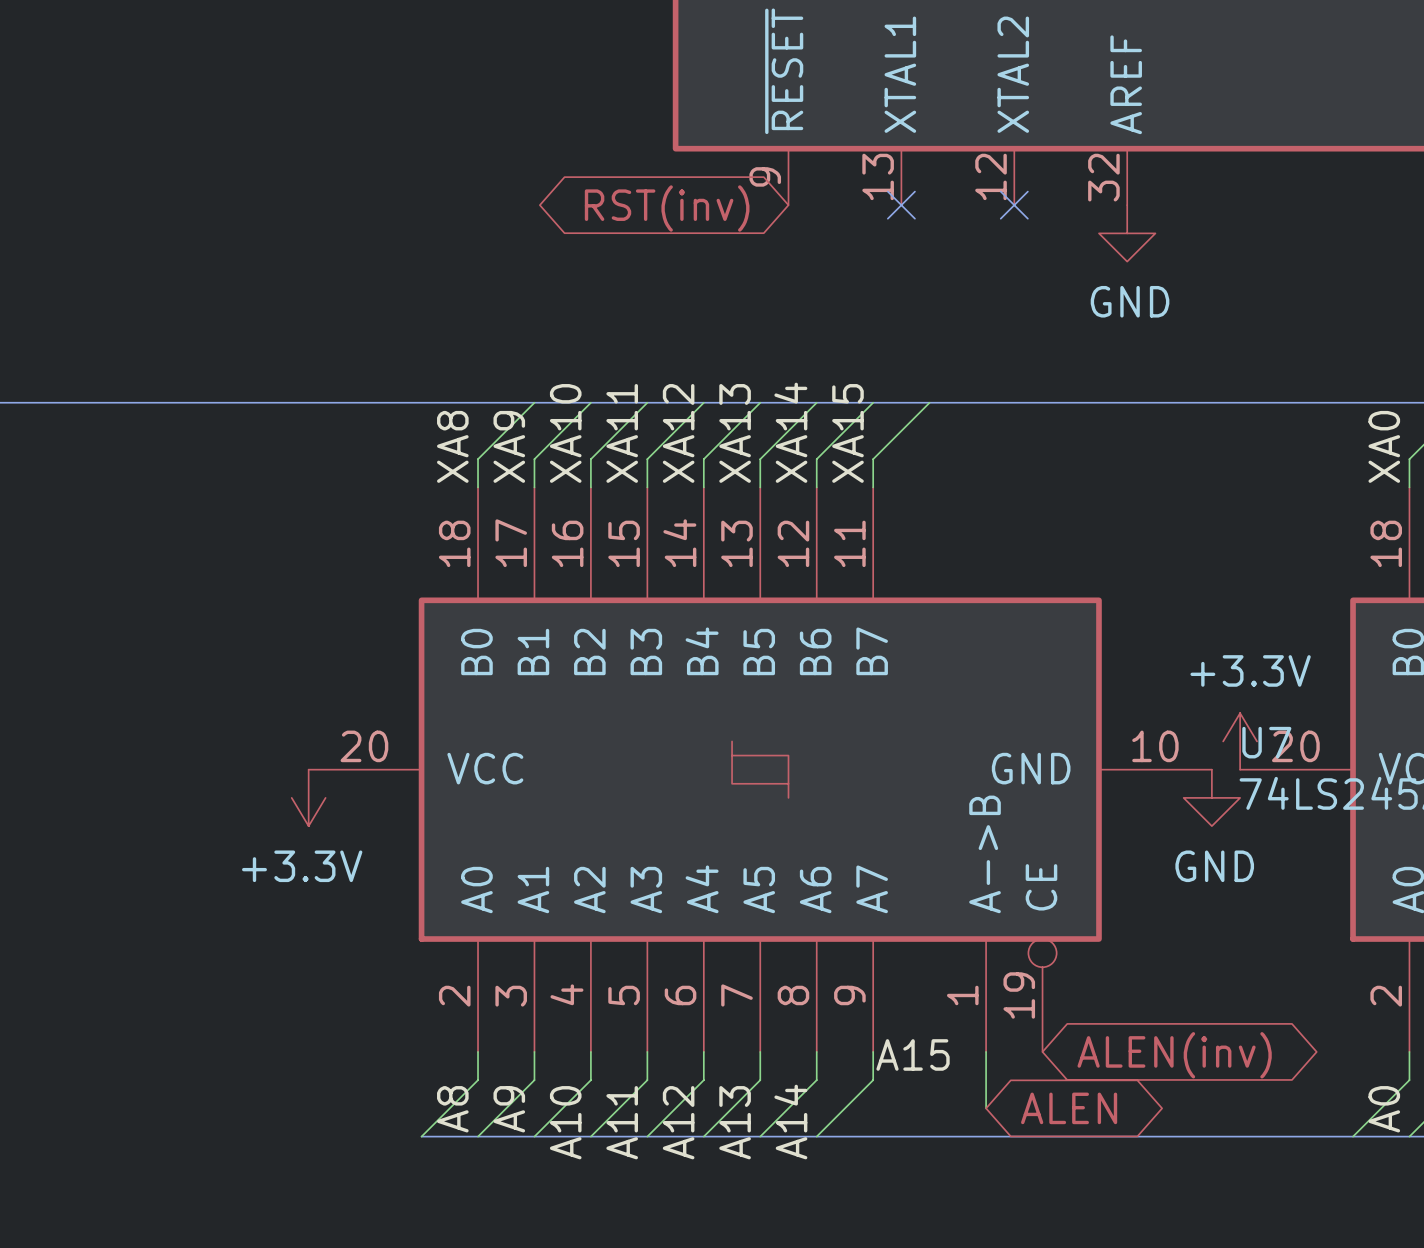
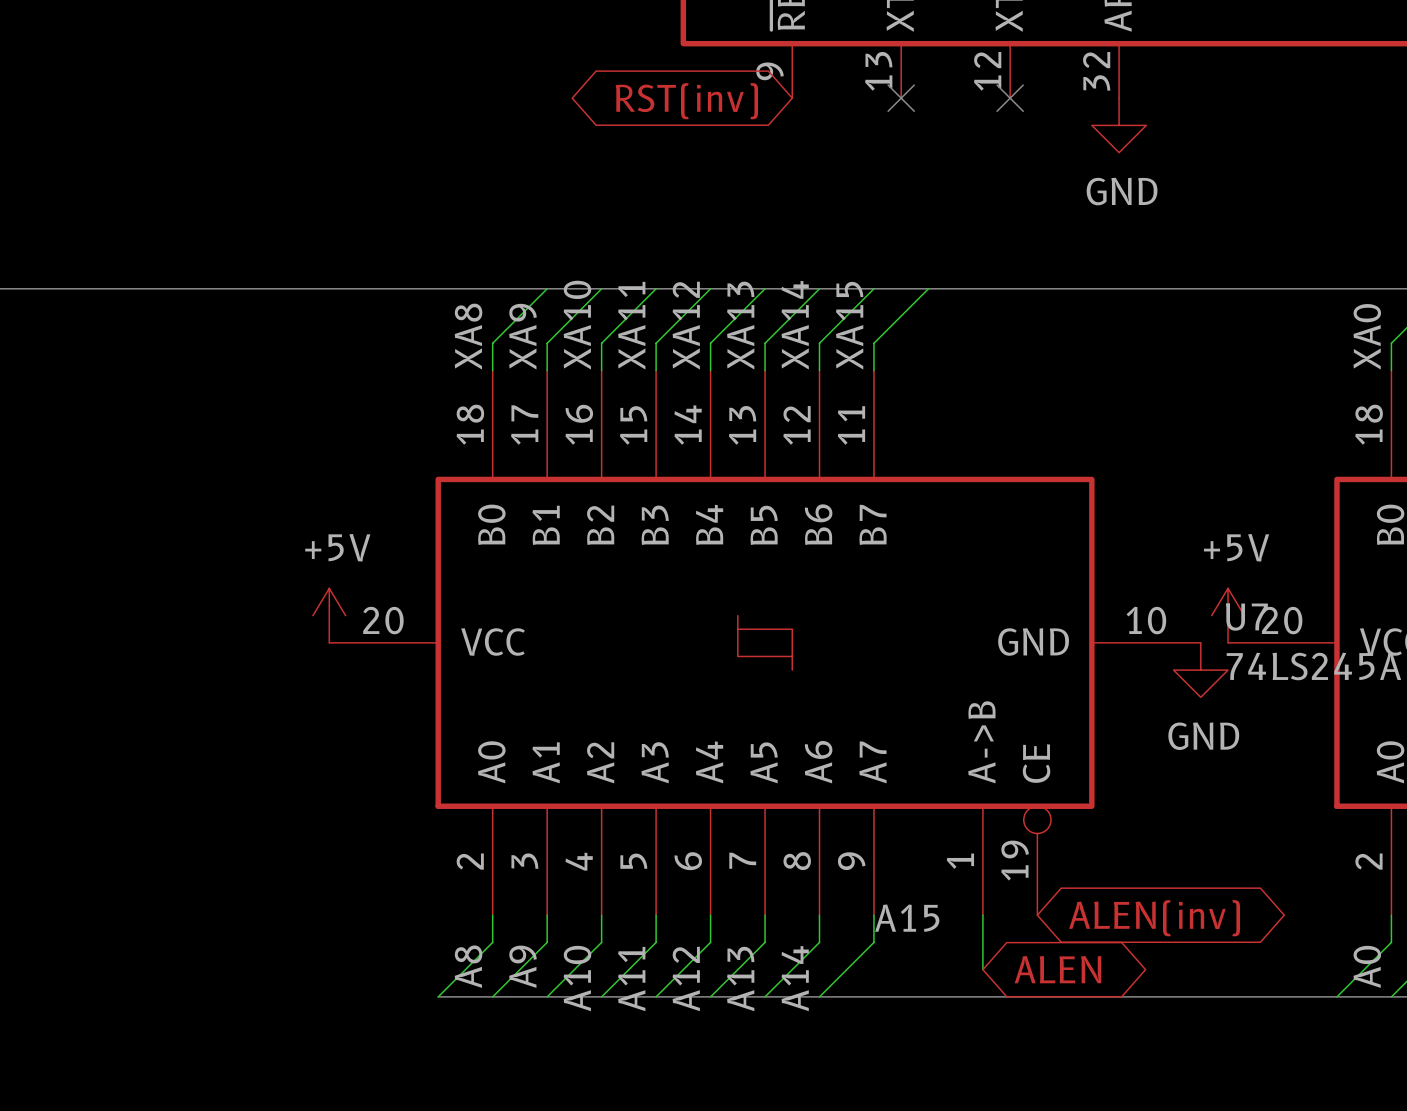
power symbol: none -> +5V (329, 615)
power symbol: +3.3V (1240, 741) -> +5V (1228, 615)
power symbol: +3.3V (308, 797) -> none

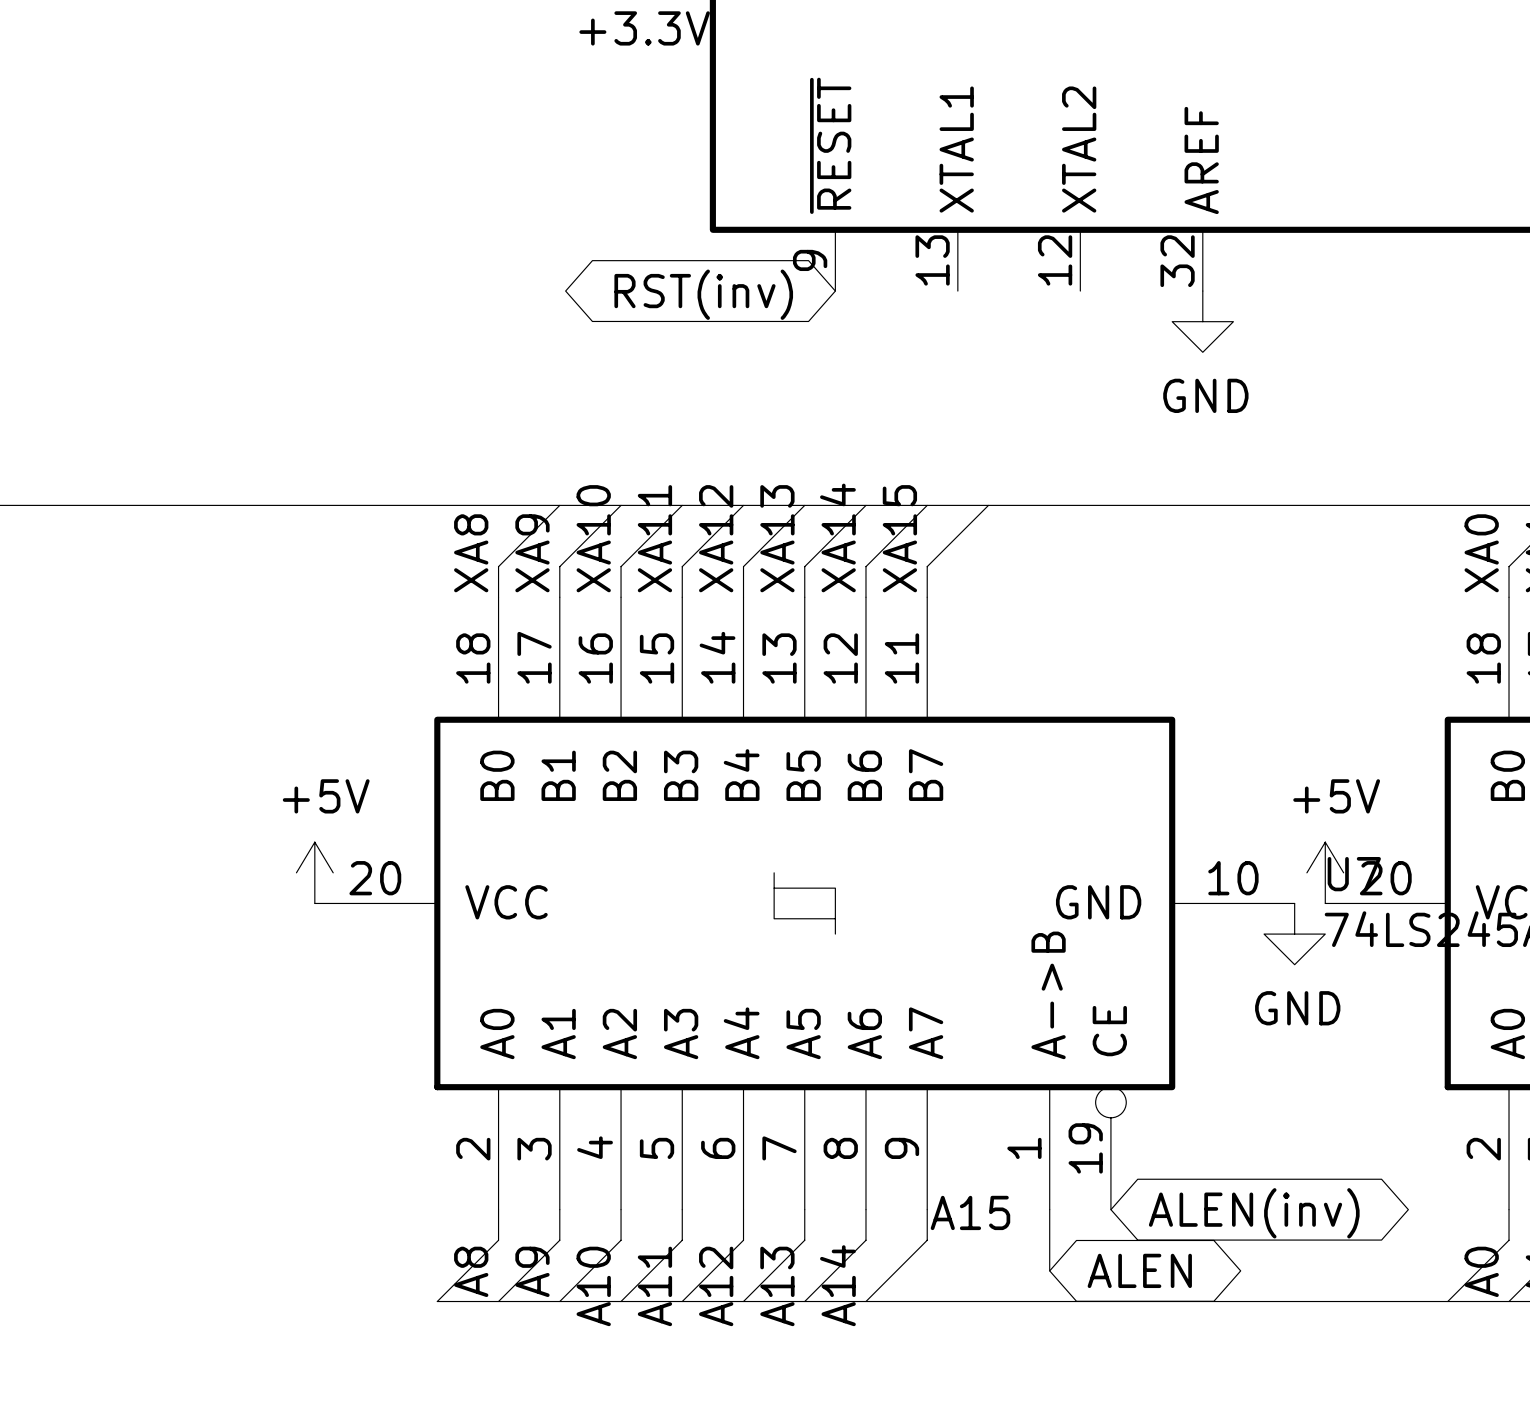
no-connect mark: (901, 98) -> none
no-connect mark: (1010, 98) -> none

